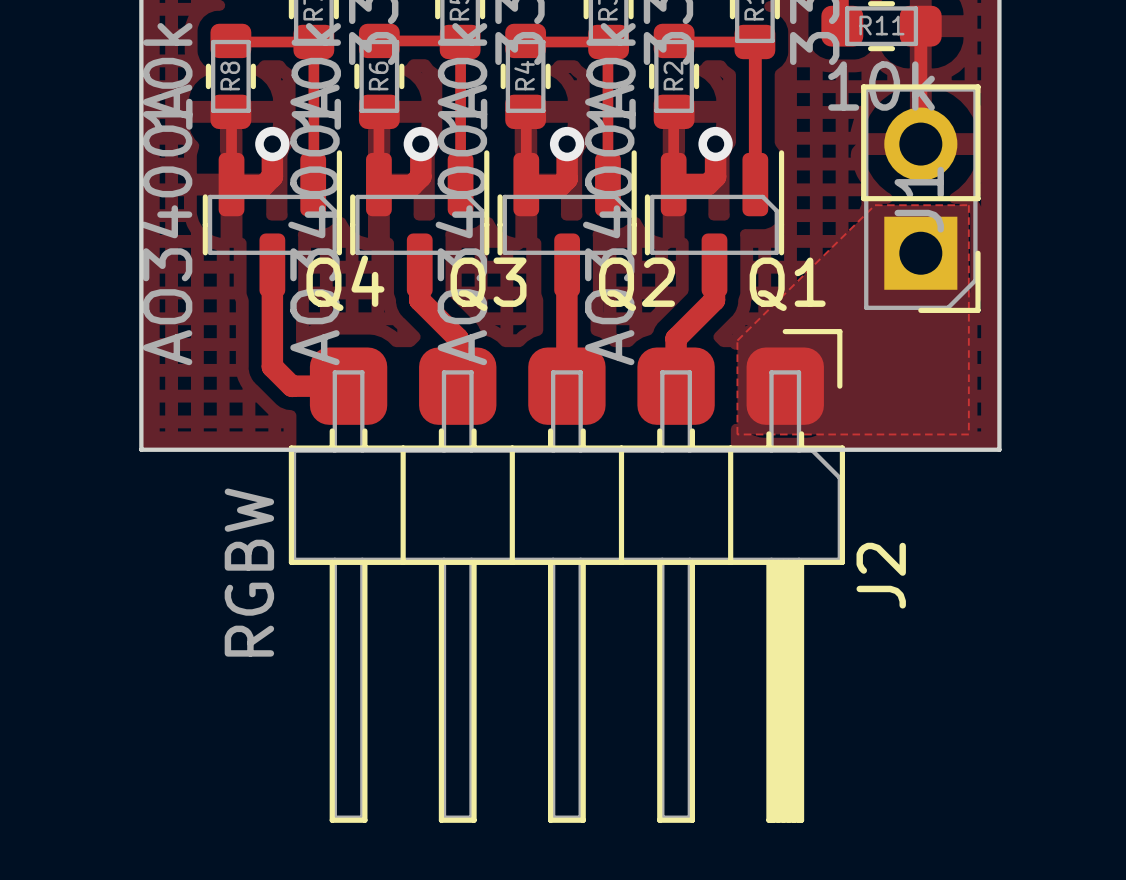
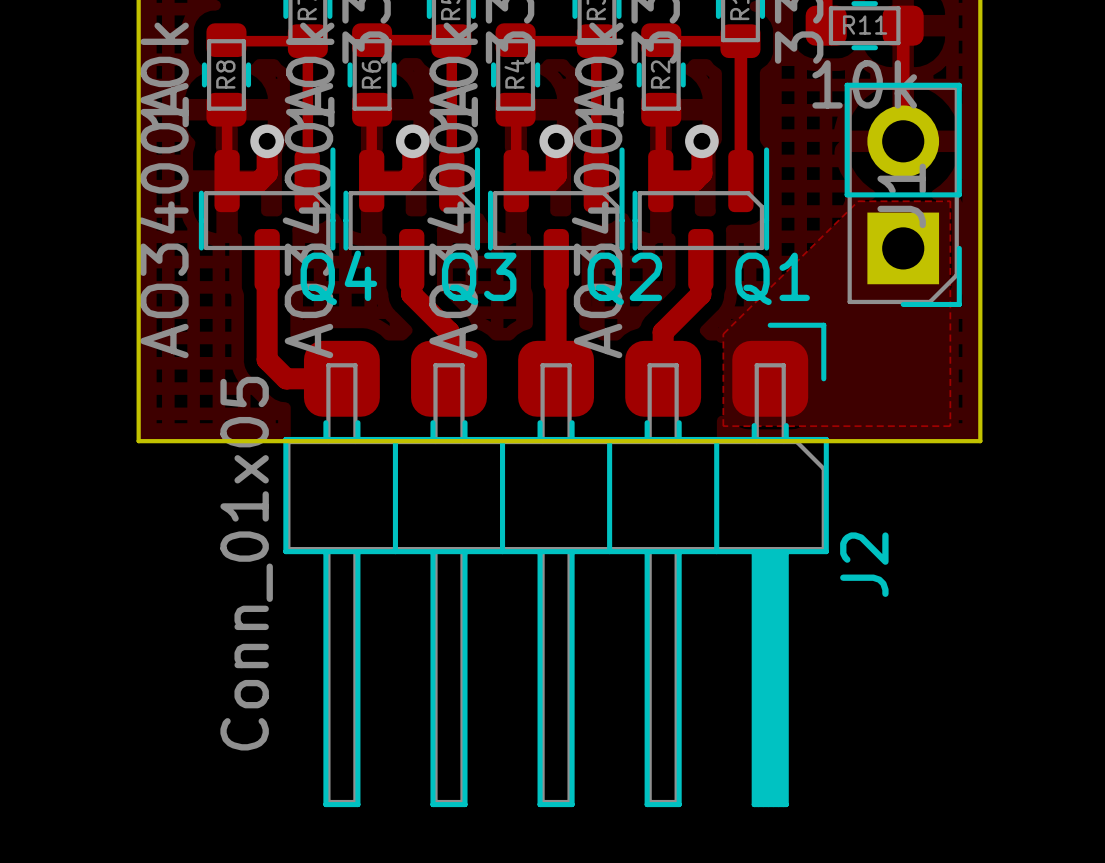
J2 value: RGBW (249, 572) -> Conn_01x05 (246, 563)

